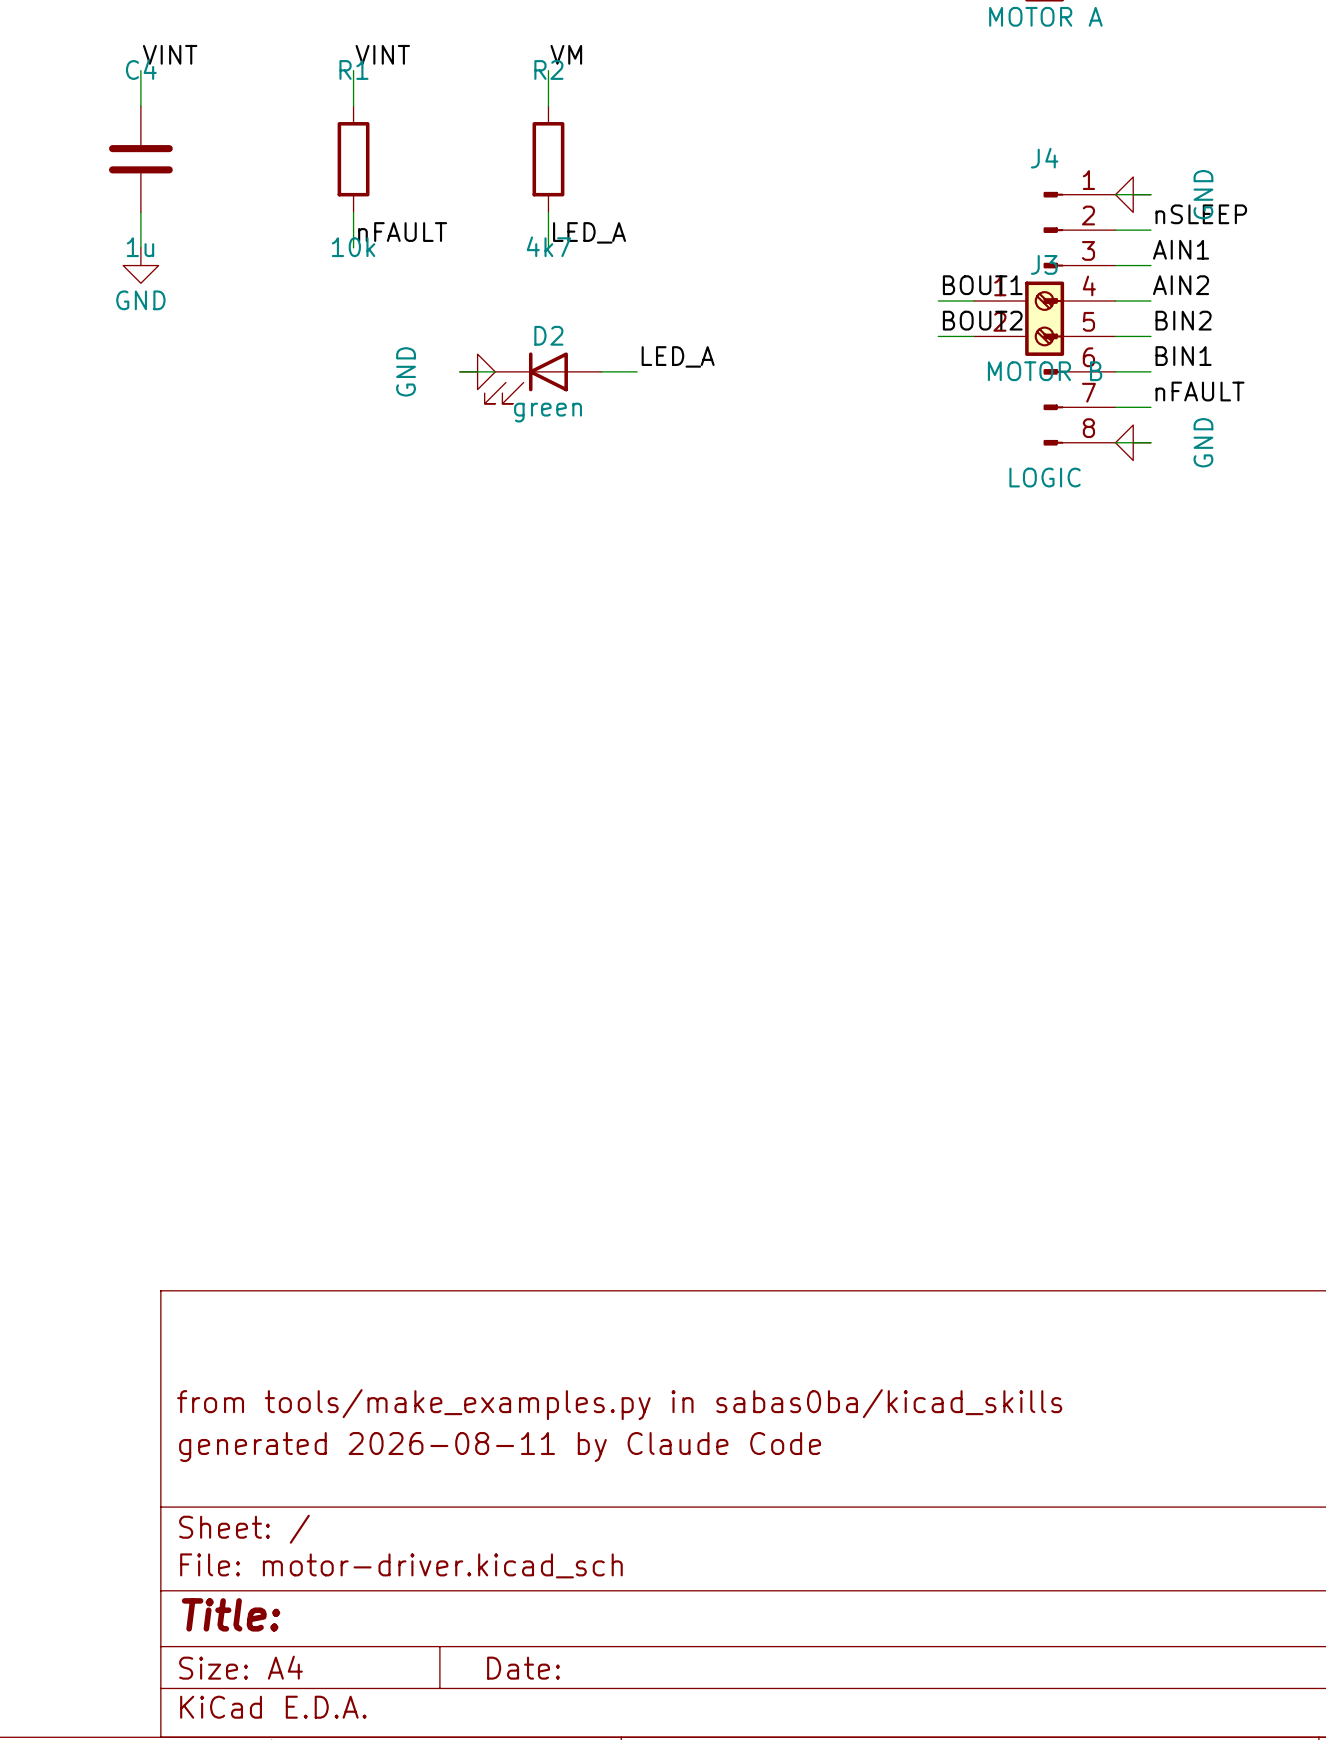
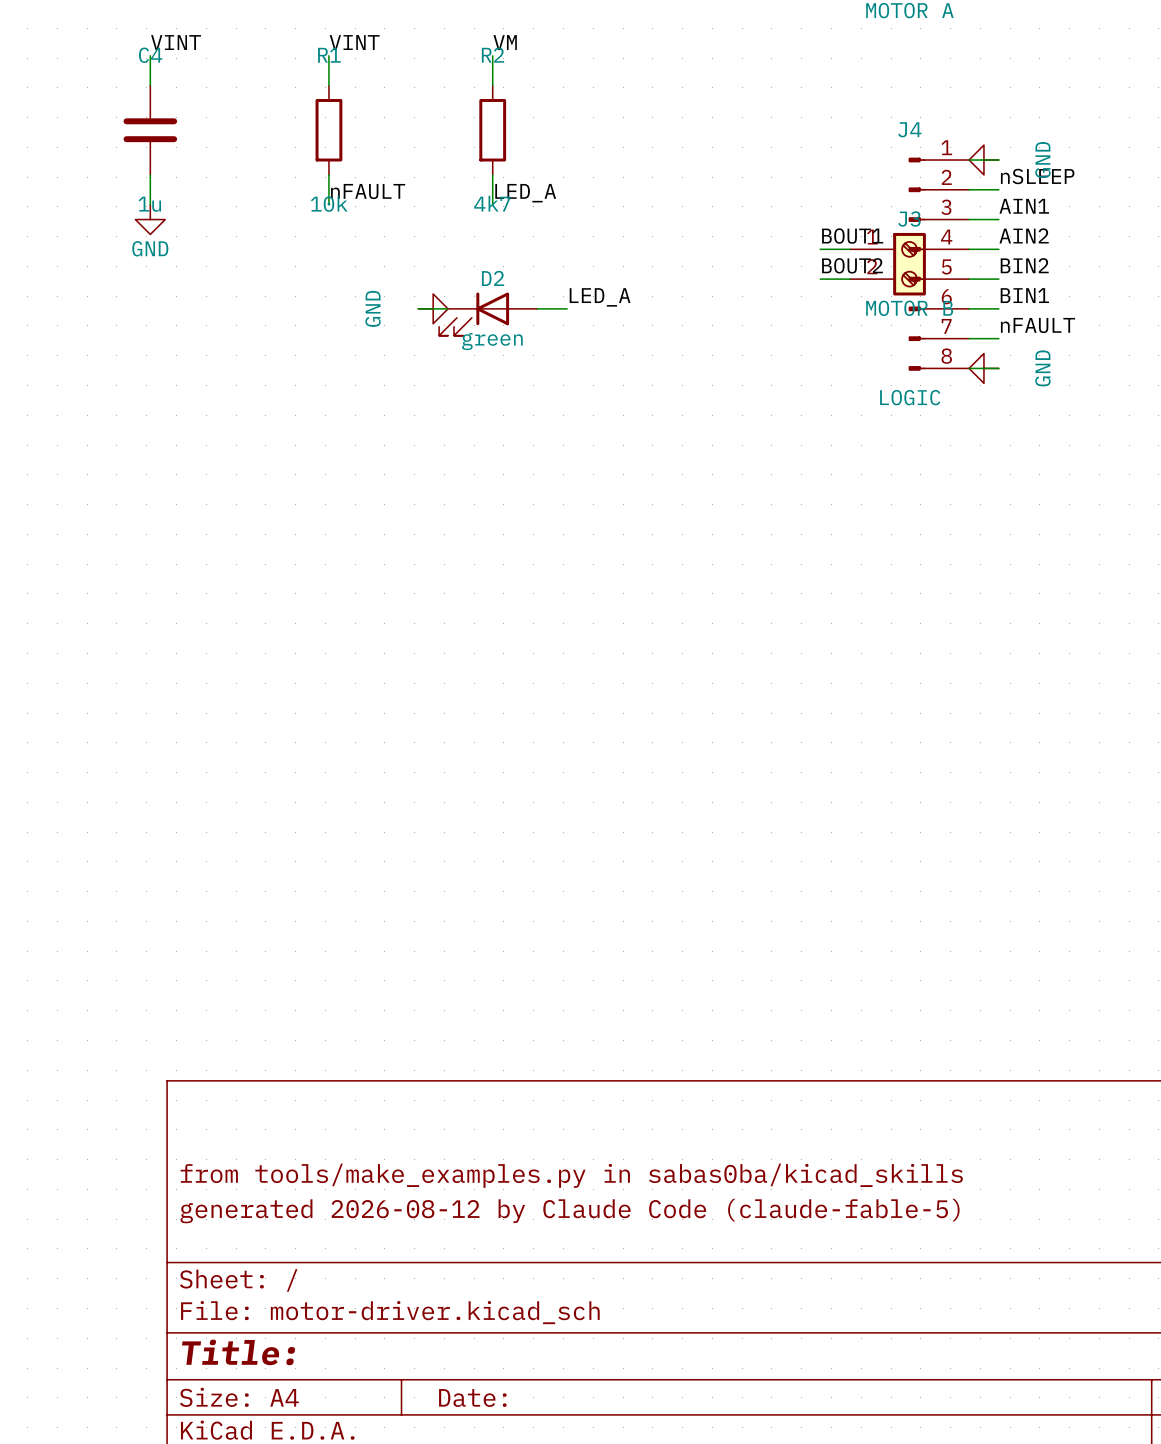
title block: generated 2026-08-11 by Claude Code (500, 1446) -> generated 2026-08-12 by Claude Code (claude-fable-5) (570, 1211)

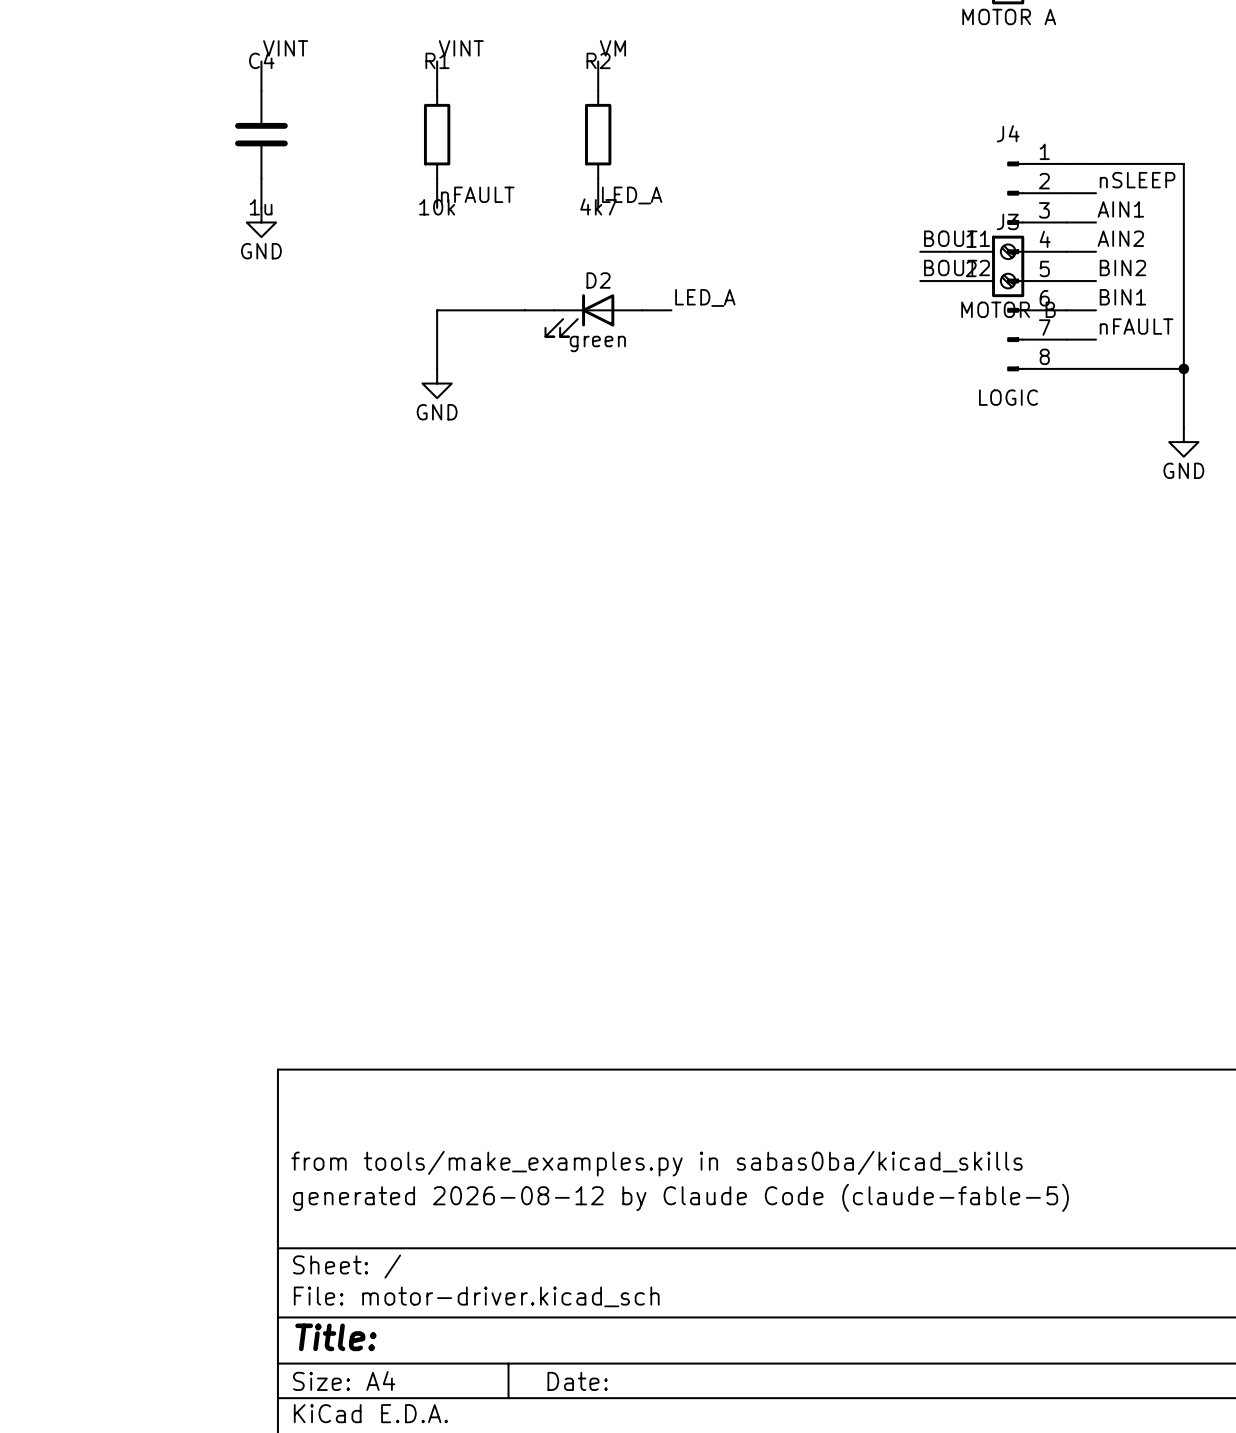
power symbol: GND (983, 160) -> none
wire: none -> (1096, 163) (1183, 163) (1183, 427)
power symbol text position: GND (373, 308) -> GND (437, 412)
wire: none -> (524, 310) (437, 310) (437, 368)
power symbol rotation: 0° (433, 308) -> 90° clockwise (437, 383)
power symbol position: GND (433, 308) -> GND (437, 383)
power symbol rotation: 0° (983, 368) -> 90° counterclockwise (1183, 442)
power symbol position: GND (983, 368) -> GND (1183, 442)
wire: none -> (1096, 368) (1183, 368)
power symbol text position: GND (1042, 368) -> GND (1183, 470)
junction: none -> (1183, 368)

